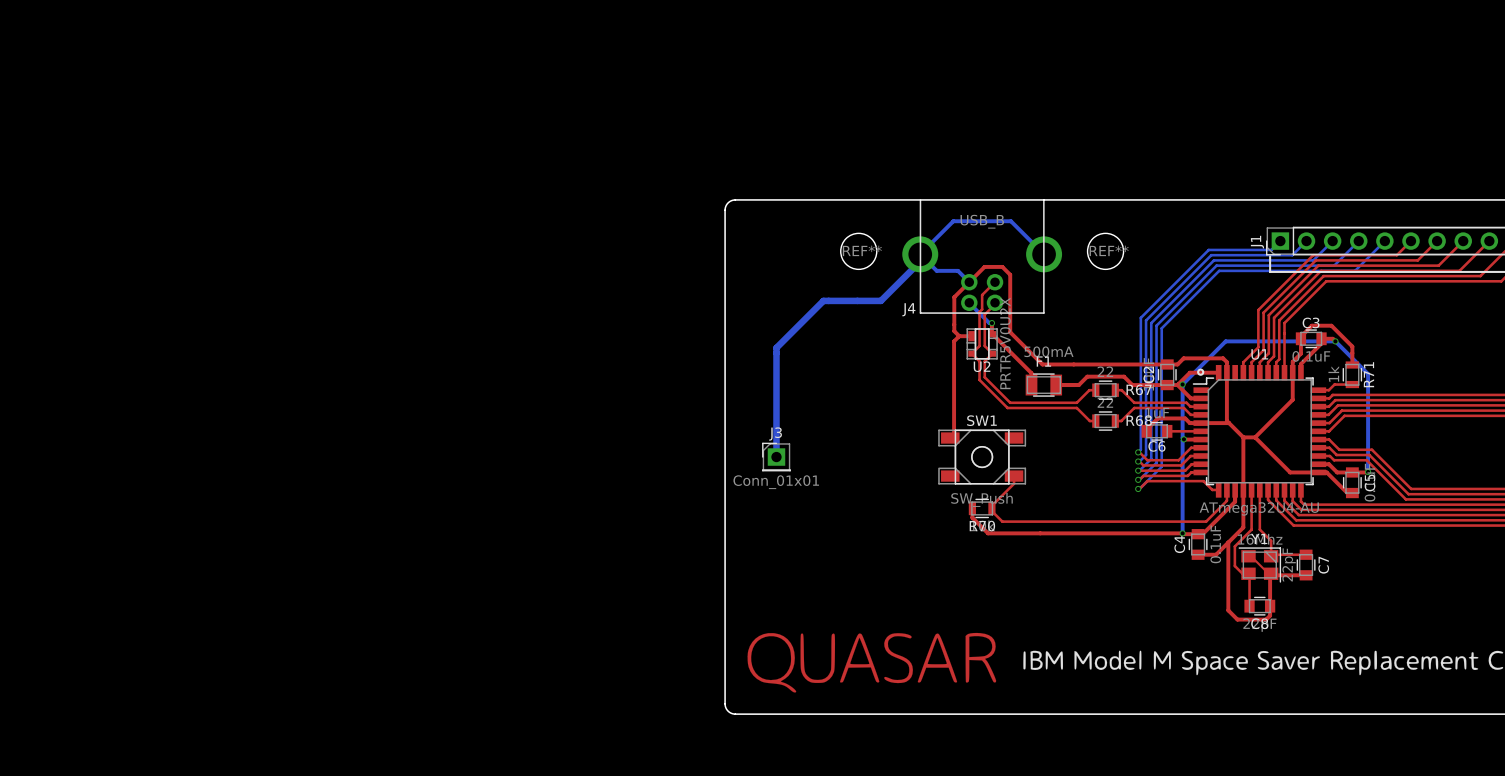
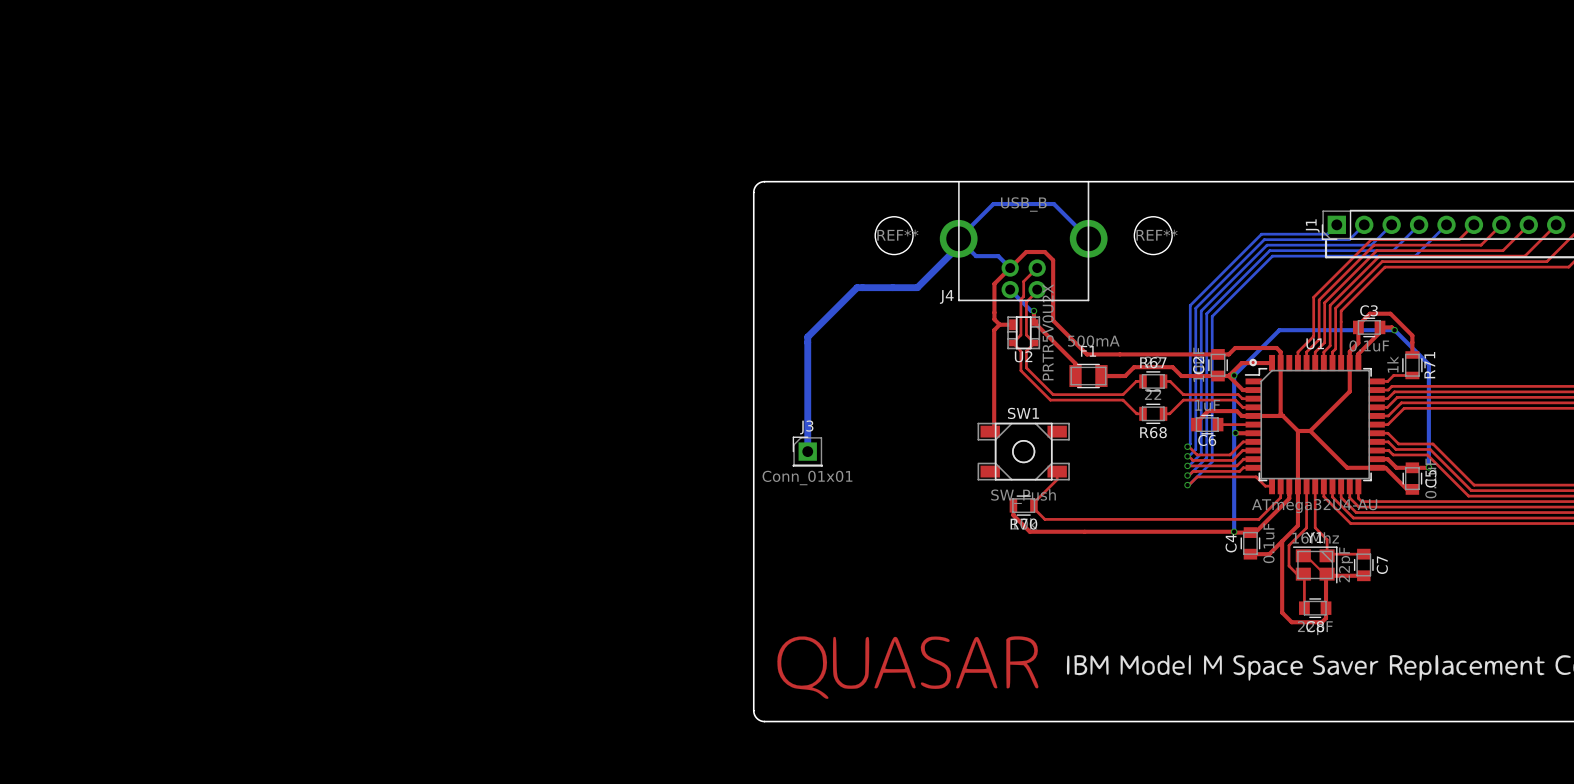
R67 name position: R67 (1139, 389) -> R67 (1153, 362)
R68 name position: R68 (1139, 420) -> R68 (1153, 432)

